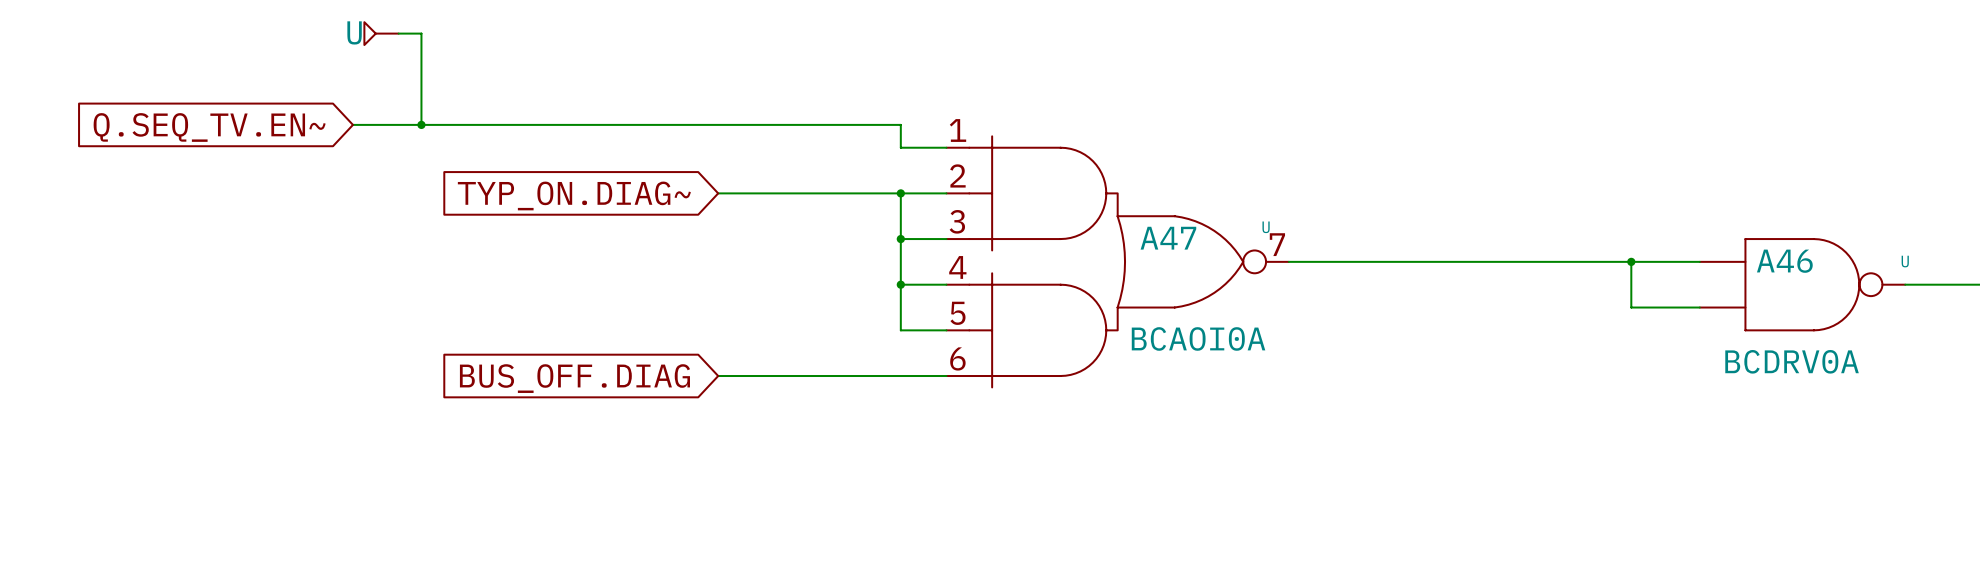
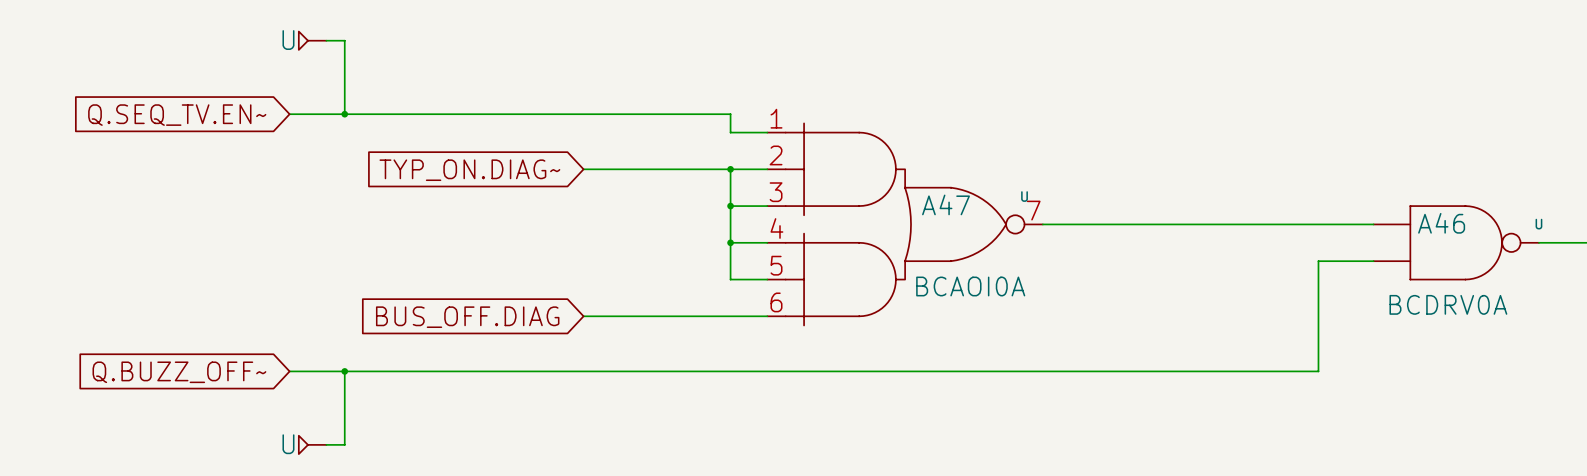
wire: (1631, 261) (1631, 307) -> (289, 371) (1318, 371) (1318, 261)
junction: (1631, 261) -> none
wire: none -> (344, 371) (344, 444) (326, 444)
junction: none -> (344, 371)
global label: none -> Q.BUZZ_OFF~ (179, 372)
U: none -> (312, 444)

